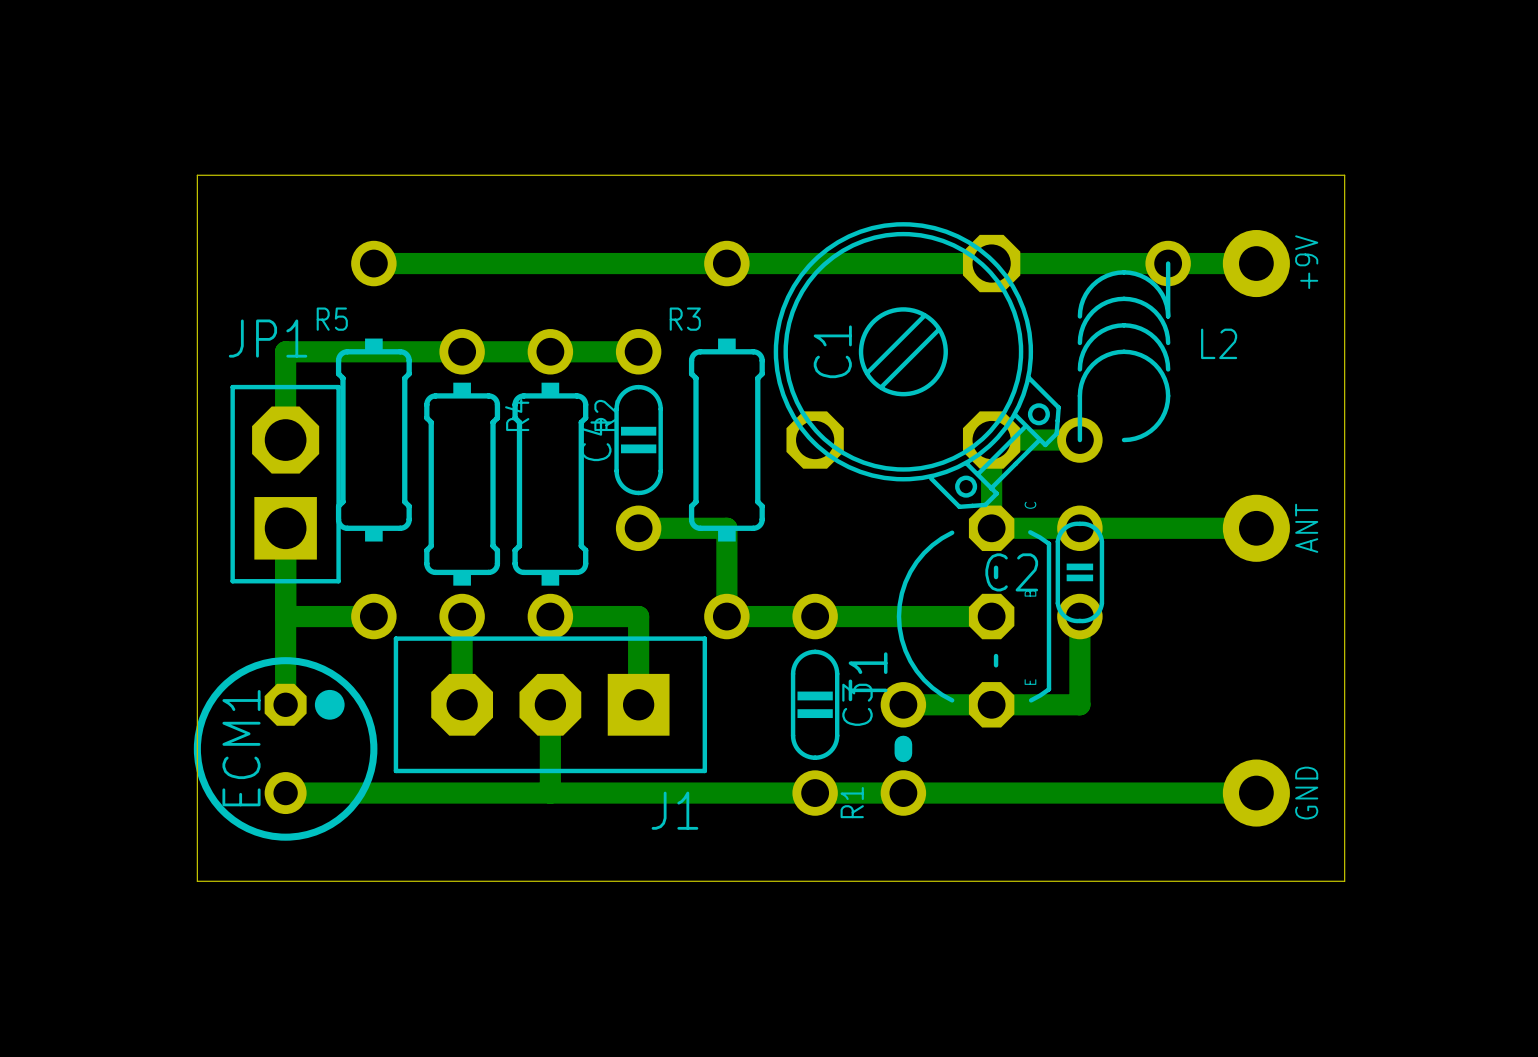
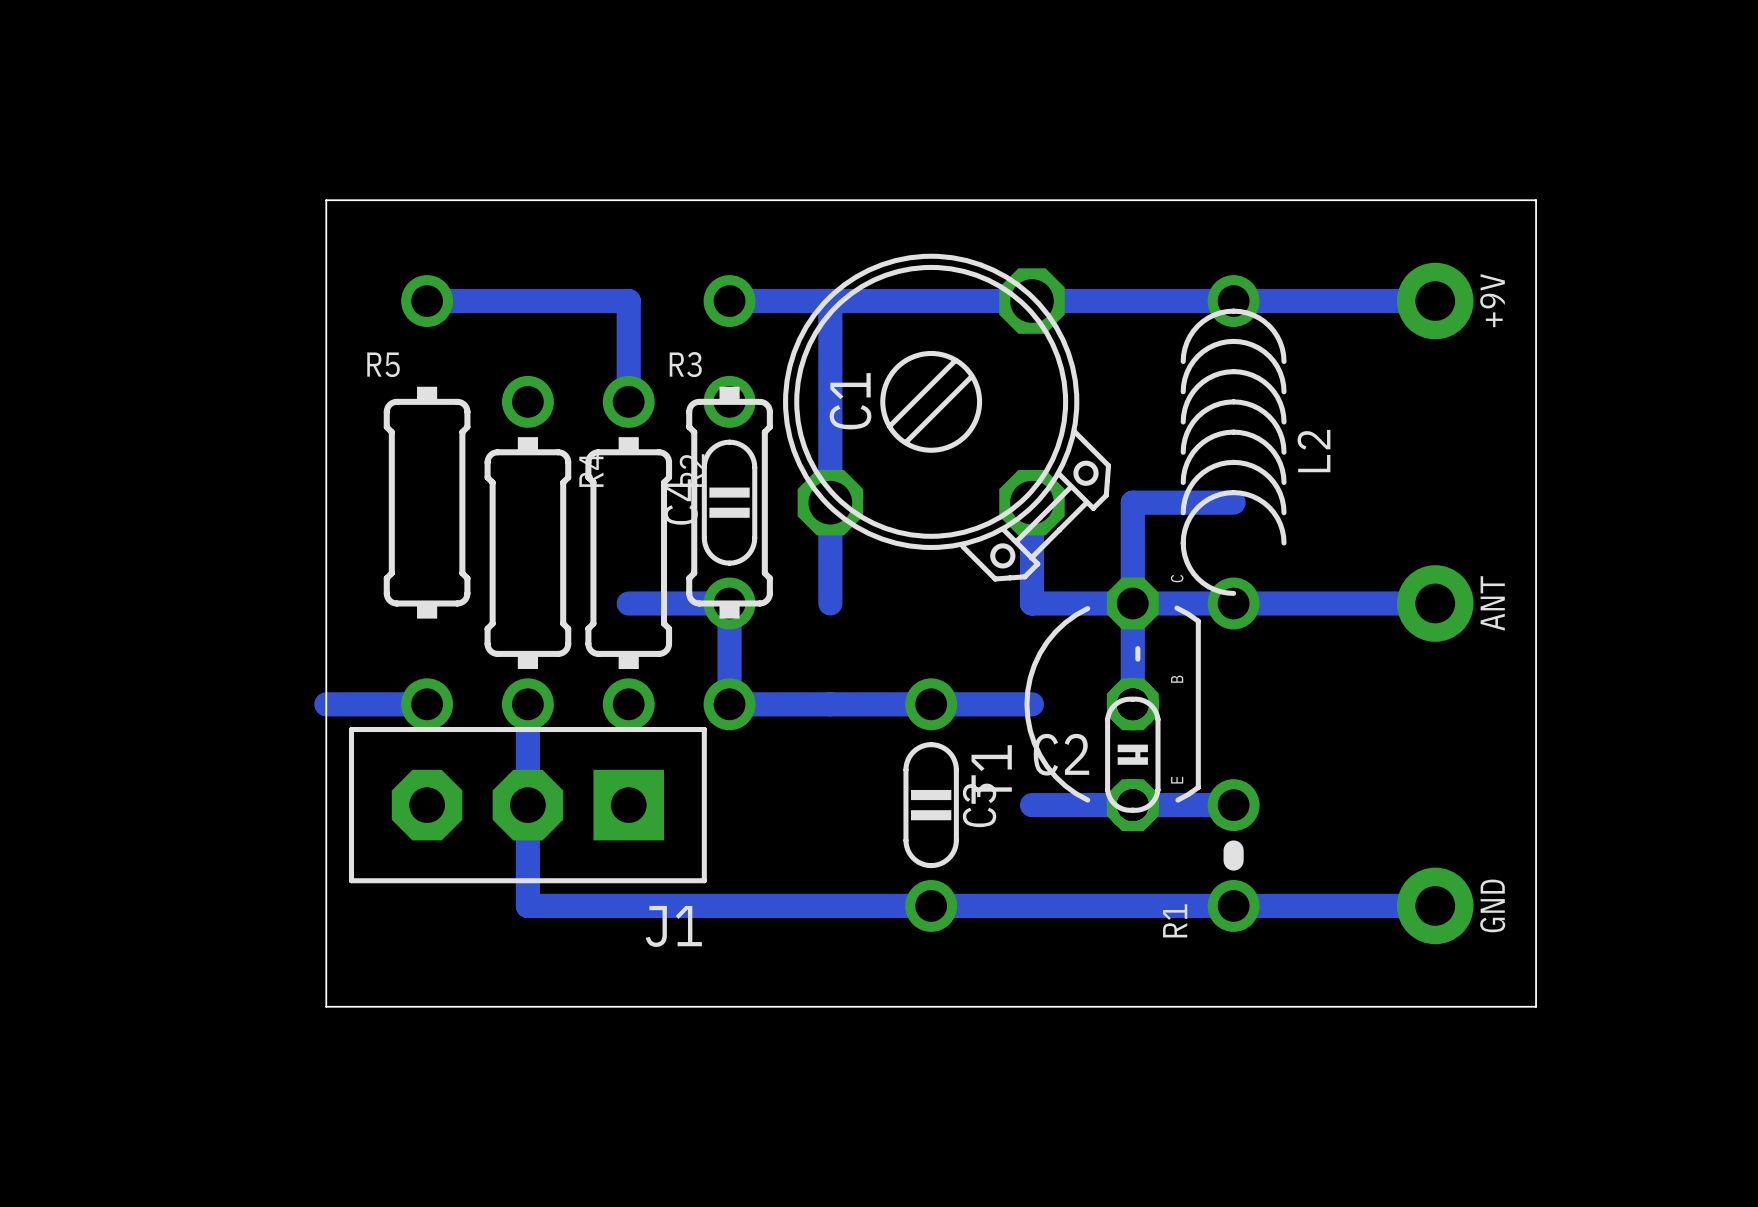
board edge: (285, 175) (197, 175) (197, 881) (285, 881) -> (326, 200) (326, 1006)
L2 footprint: [1057, 240, 1191, 463] -> [1180, 275, 1287, 630]
bottom track: (550, 263) (638, 263) -> (628, 301) (628, 401)
bottom track: none -> (830, 301) (830, 603)
bottom track: (638, 351) (285, 351) (285, 440) -> none
C1 position: (917, 365) -> (947, 417)
R3 position: (726, 440) -> (729, 502)
JP1: (285, 484) -> none
bottom track: (285, 528) (285, 704) -> none
bottom track: (638, 528) (726, 528) (726, 616) -> (628, 603) (729, 603) (729, 704) (830, 704)
C2 position: (1079, 572) -> (1132, 754)
bottom track: (550, 616) (638, 616) (638, 704) -> none
bottom track: (903, 616) (991, 616) -> (1031, 502) (1031, 603) (1132, 603) (1132, 704)
bottom track: (1079, 616) (1079, 704) -> none
bottom track: (550, 704) (550, 793) -> none
J1 position: (550, 704) -> (527, 805)
ECM1: (285, 748) -> none
R1 position: (903, 748) -> (1233, 855)
bottom track: (285, 793) (462, 793) -> (527, 805) (527, 905)

